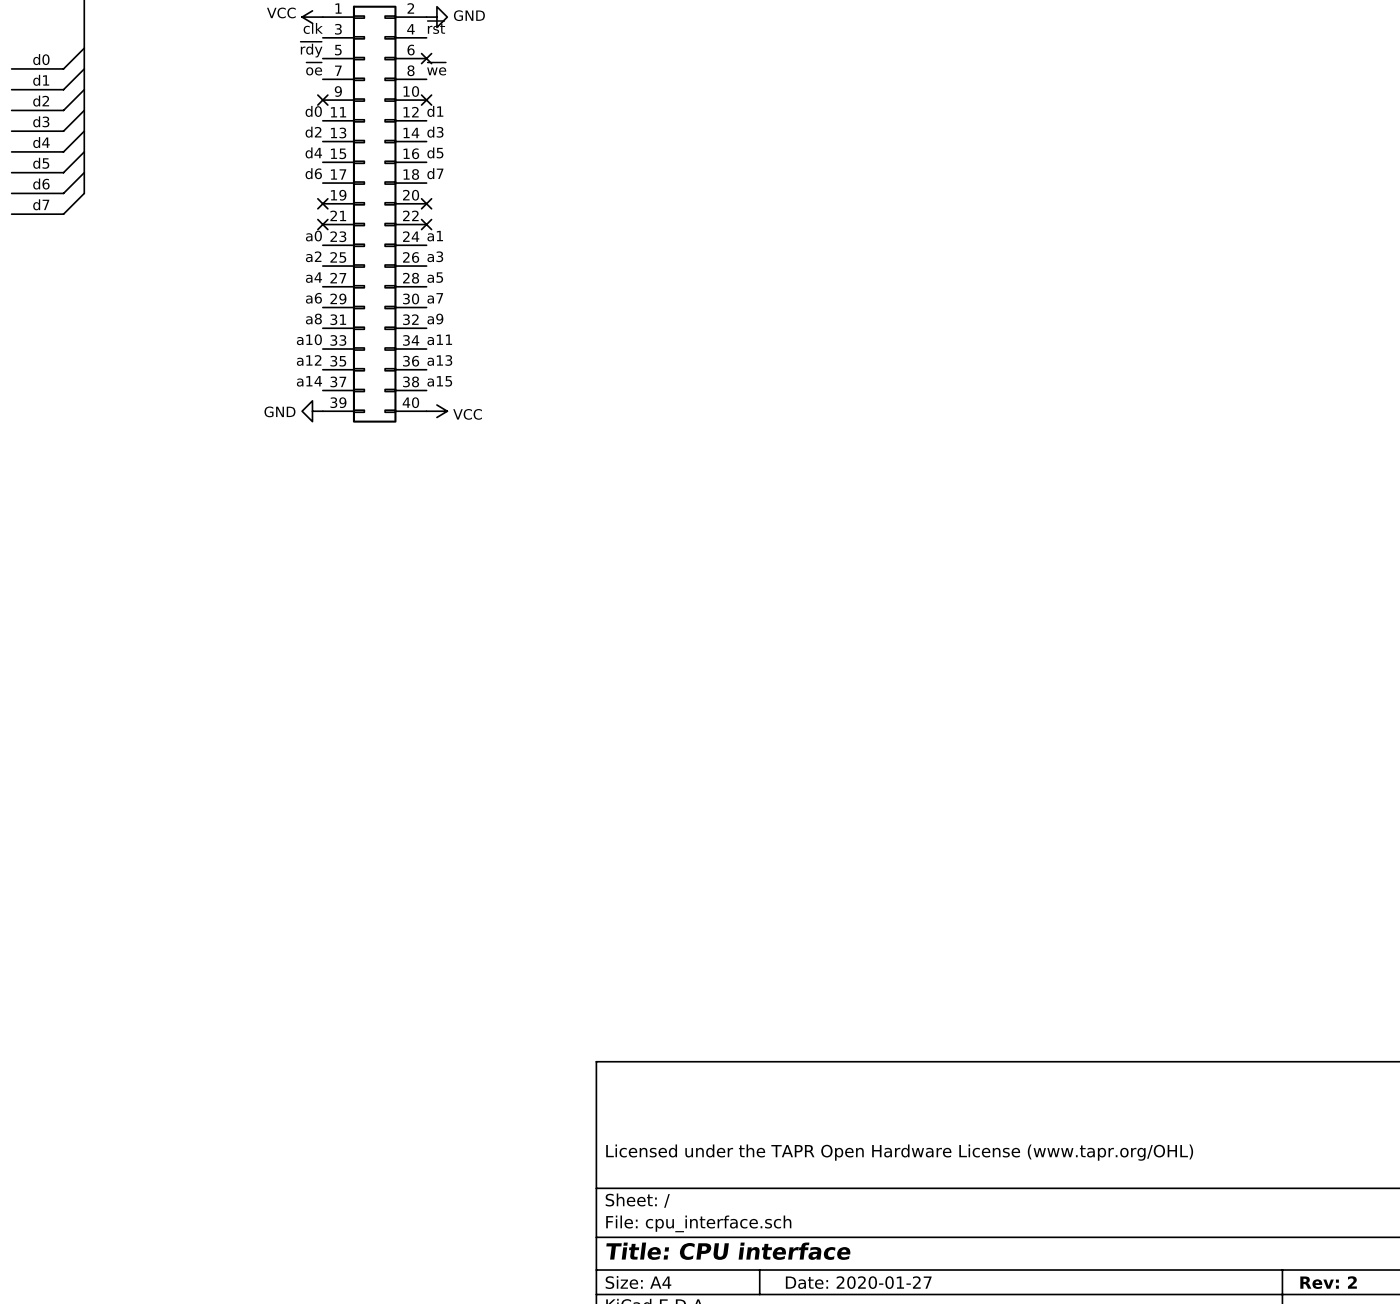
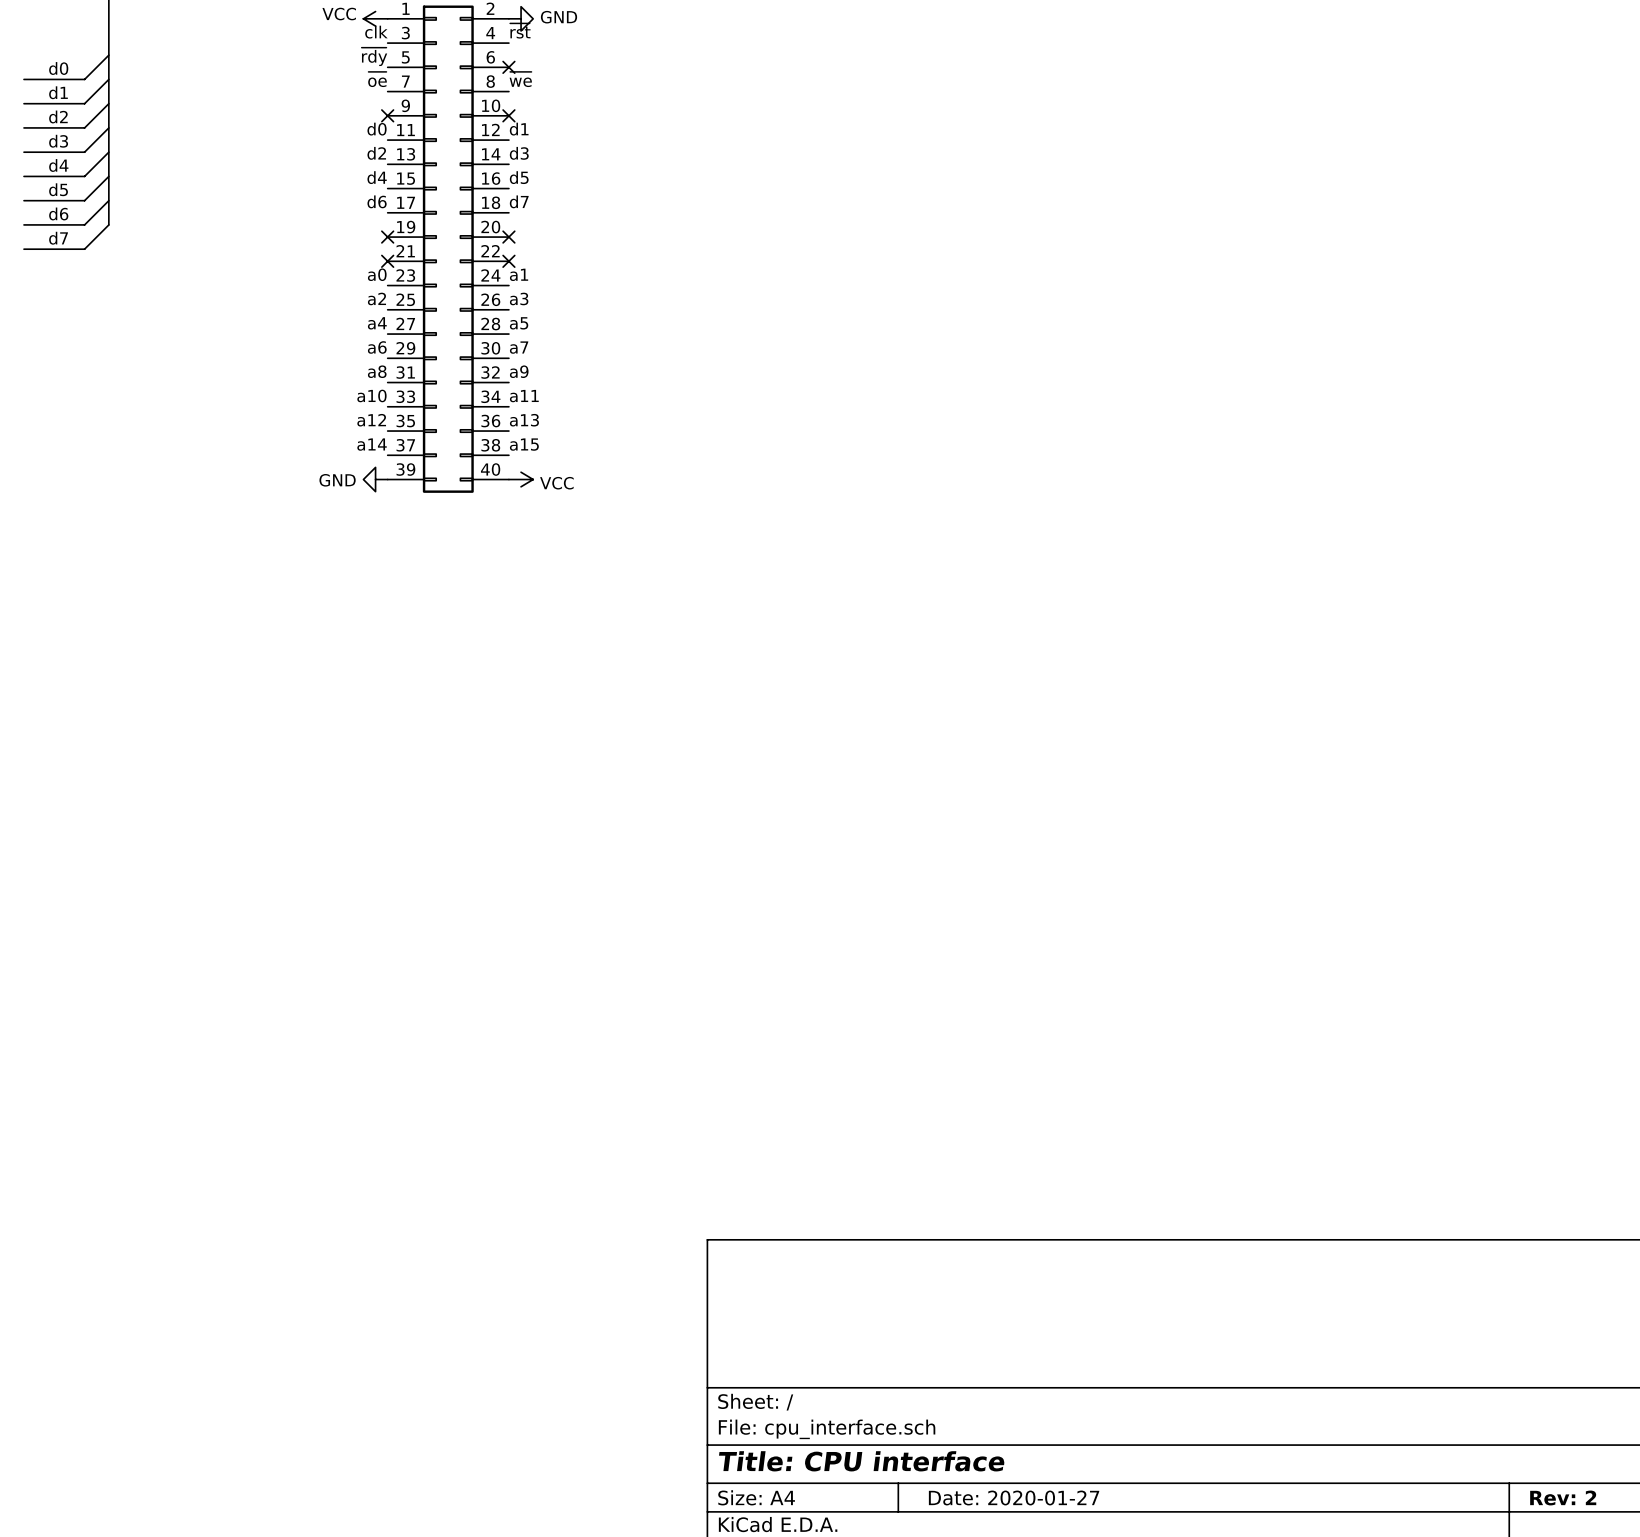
title block: Licensed under the TAPR Open Hardware License (www.tapr.org/OHL) (899, 1152) -> none

